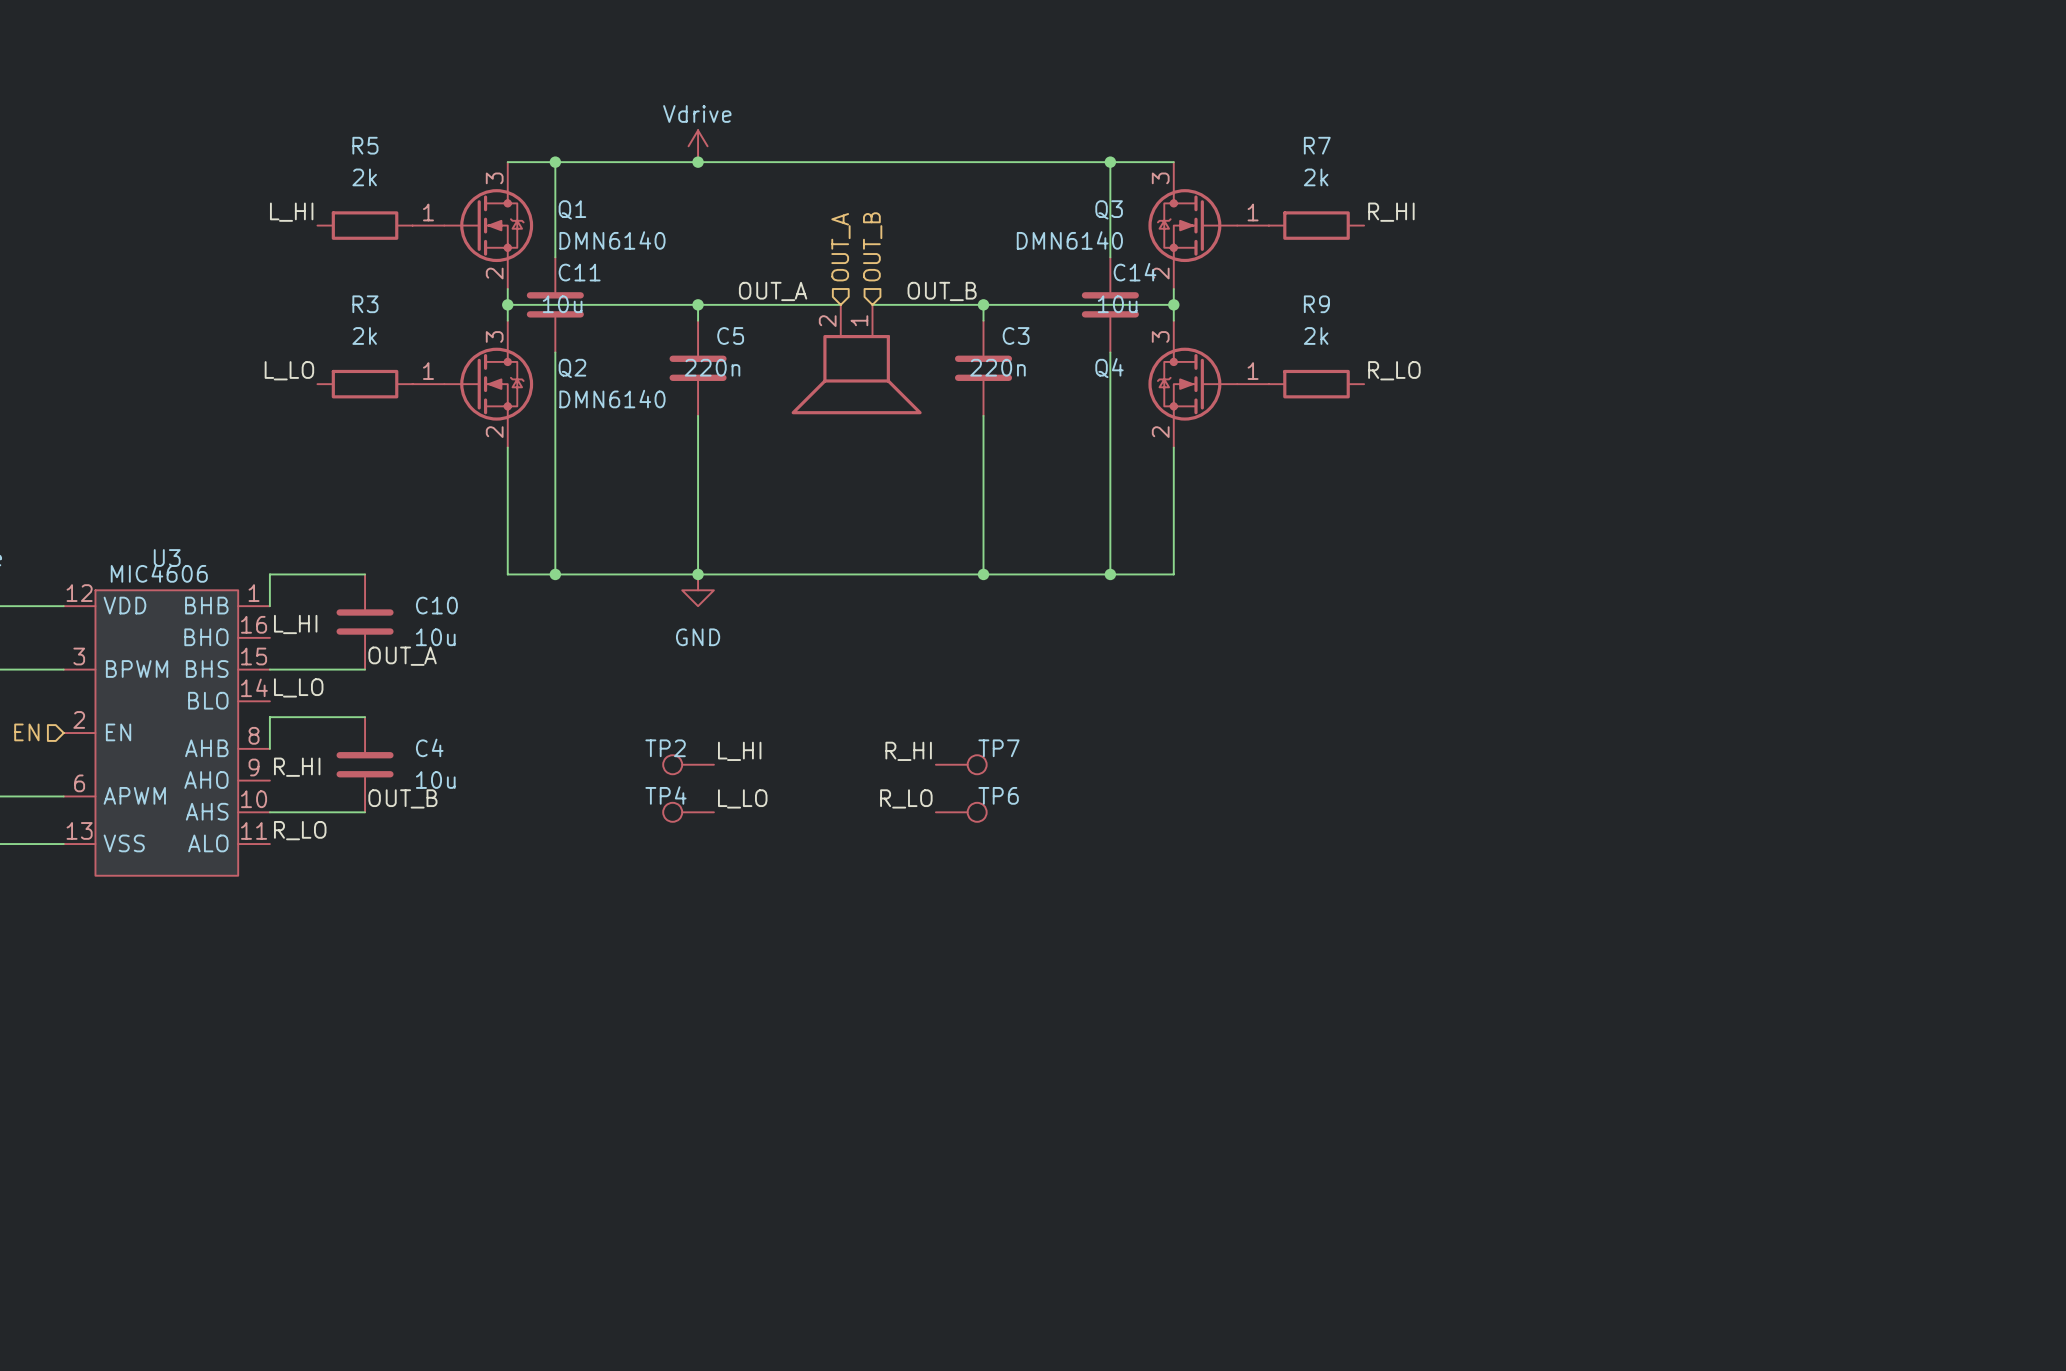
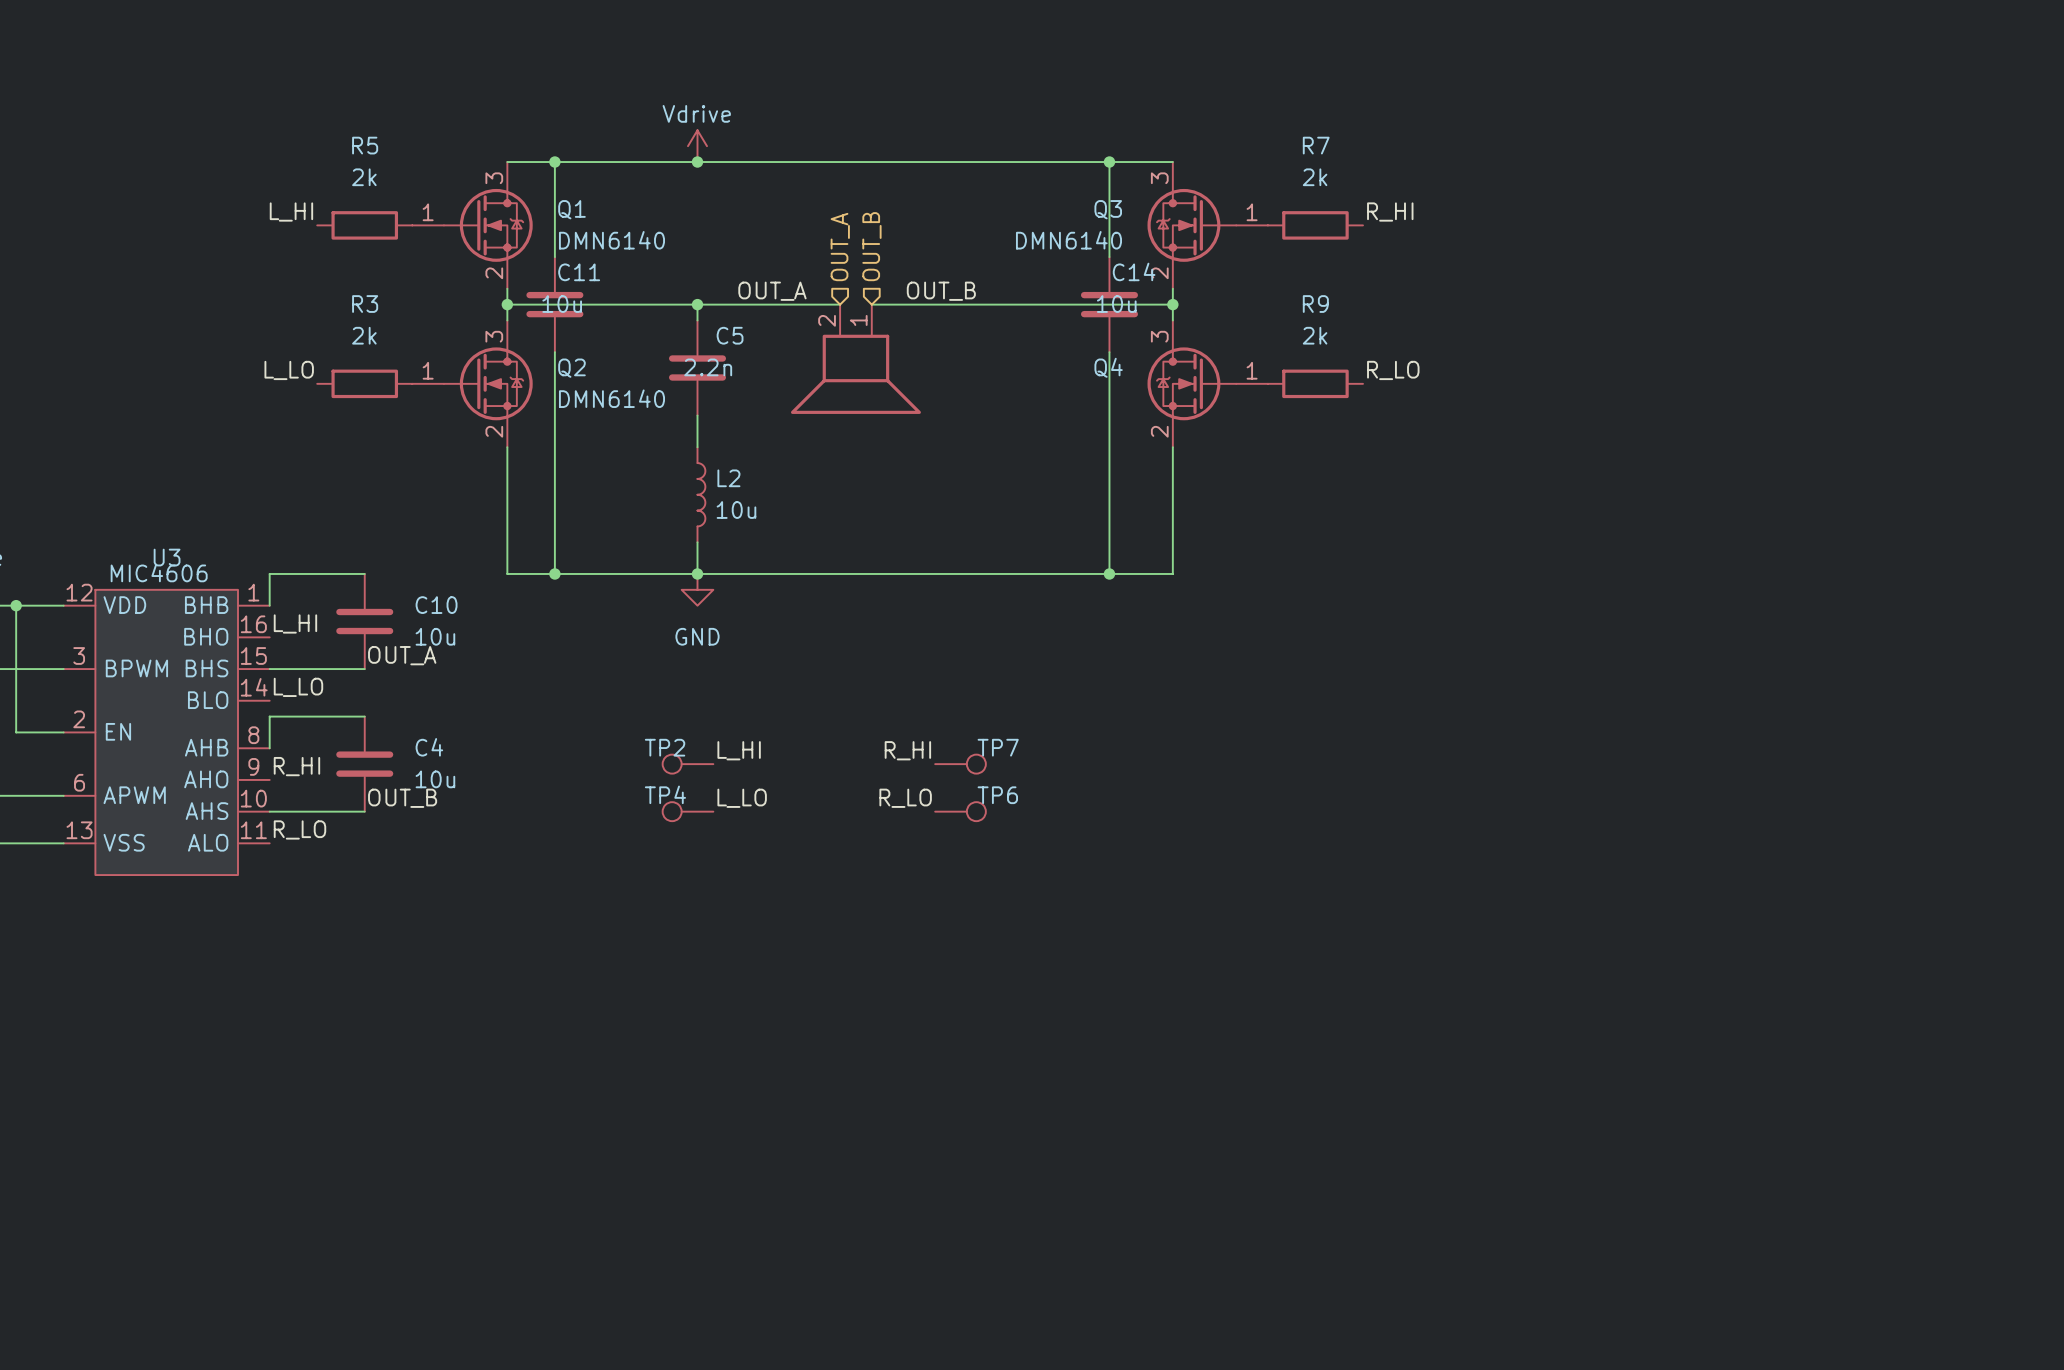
wire: (983, 304) (983, 320) -> none
junction: (983, 304) -> none
C5 value: 220n (712, 367) -> 2.2n (708, 367)
C3: 220n (983, 368) -> none
wire: (983, 415) (983, 574) -> none
wire: (698, 447) (698, 542) -> none
L2: none -> 10u (701, 494)
junction: (983, 574) -> none
wire: none -> (16, 605) (16, 732) (63, 732)
junction: none -> (16, 605)
hierarchical label: EN (26, 732) -> none

